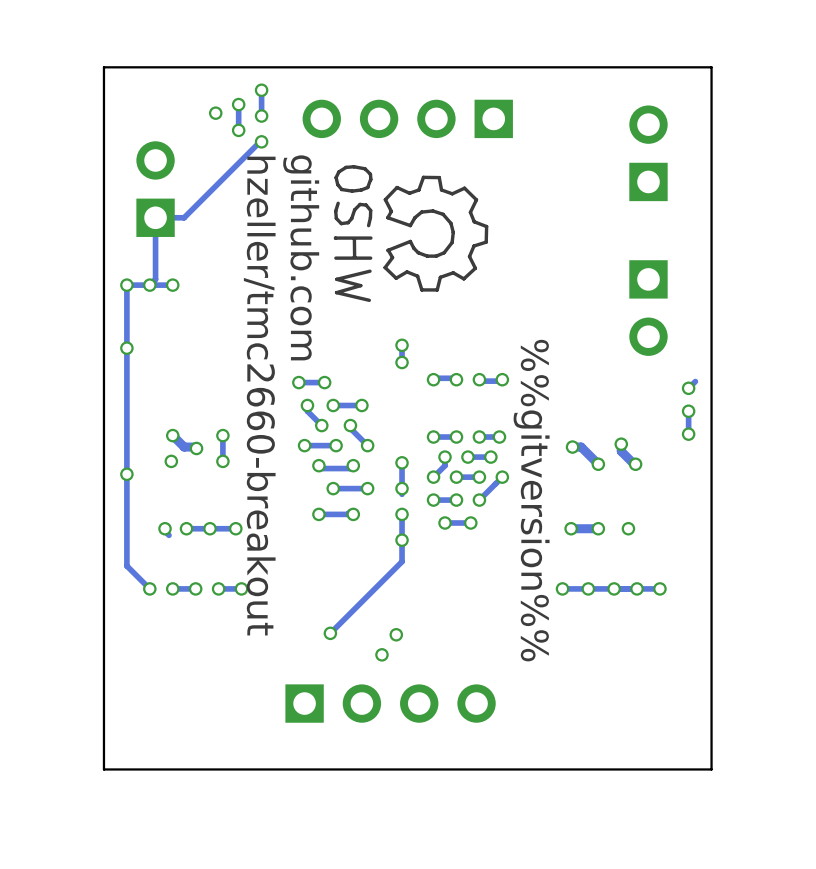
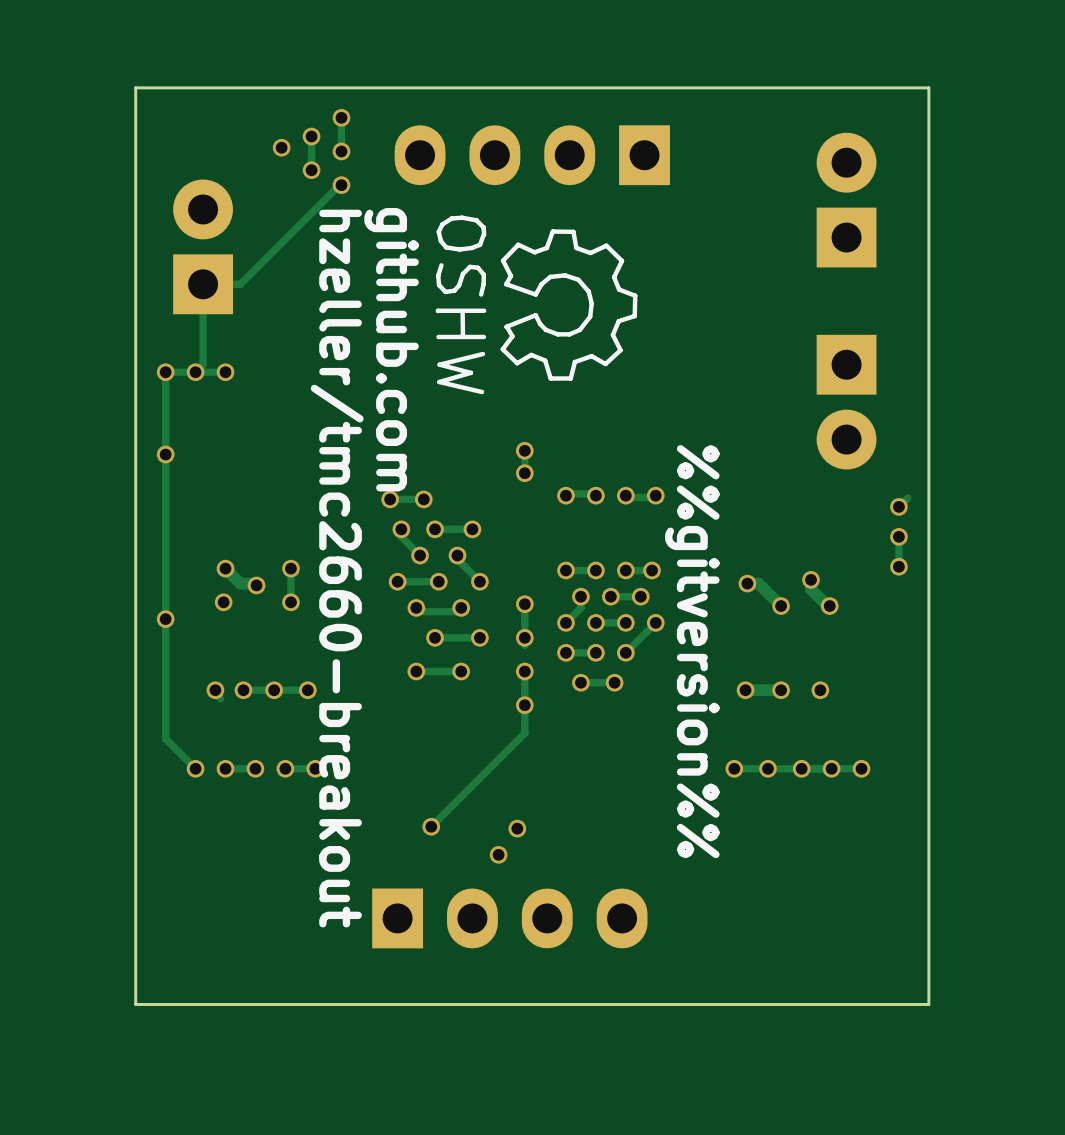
part footprint: [302, 99, 513, 139] -> [394, 125, 670, 186]
part footprint: [629, 105, 668, 202] -> [816, 132, 877, 268]
part footprint: [136, 141, 175, 237] -> [173, 179, 234, 315]
part footprint: [629, 260, 668, 356] -> [816, 334, 877, 470]
part footprint: [285, 684, 496, 723] -> [372, 888, 648, 949]

